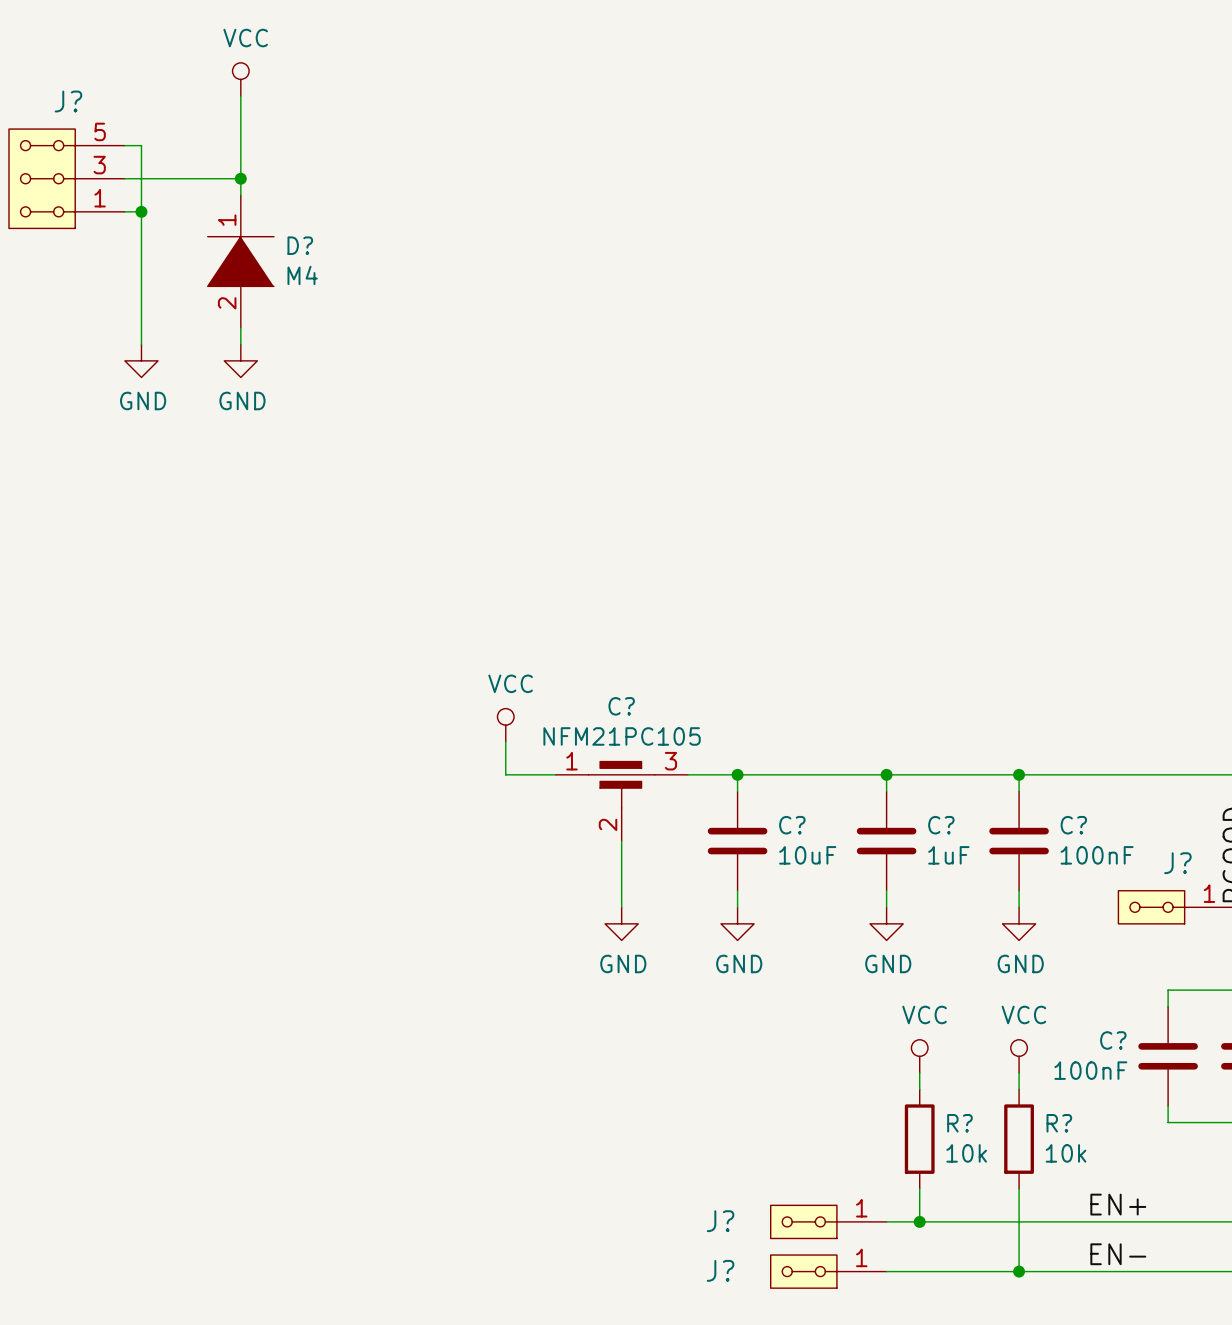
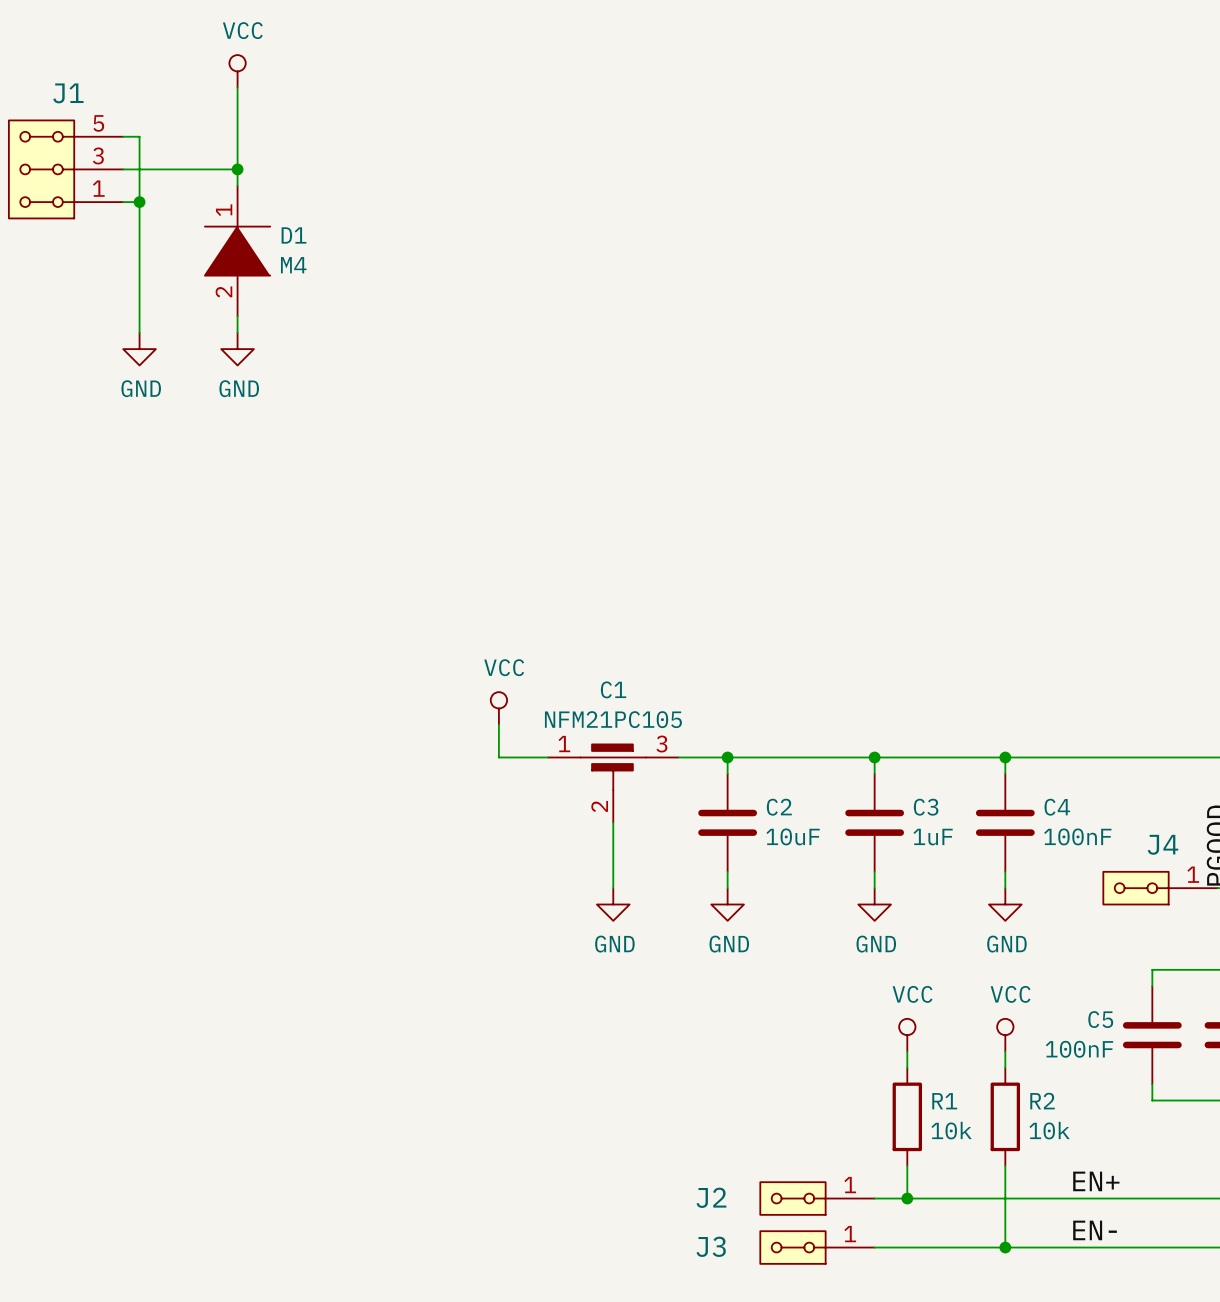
J? name: J? (68, 101) -> J1 (68, 93)
D? name: D? (300, 245) -> D1 (293, 235)
C? name: C? (621, 706) -> C1 (613, 689)
C? name: C? (792, 825) -> C2 (779, 807)
C? name: C? (941, 825) -> C3 (926, 807)
C? name: C? (1073, 825) -> C4 (1057, 807)
J? name: J? (1177, 863) -> J4 (1162, 844)
C? name: C? (1113, 1040) -> C5 (1100, 1019)
R? name: R? (959, 1123) -> R1 (944, 1101)
R? name: R? (1059, 1123) -> R2 (1042, 1101)
J? name: J? (720, 1221) -> J2 (711, 1197)
J? name: J? (720, 1270) -> J3 (711, 1246)

